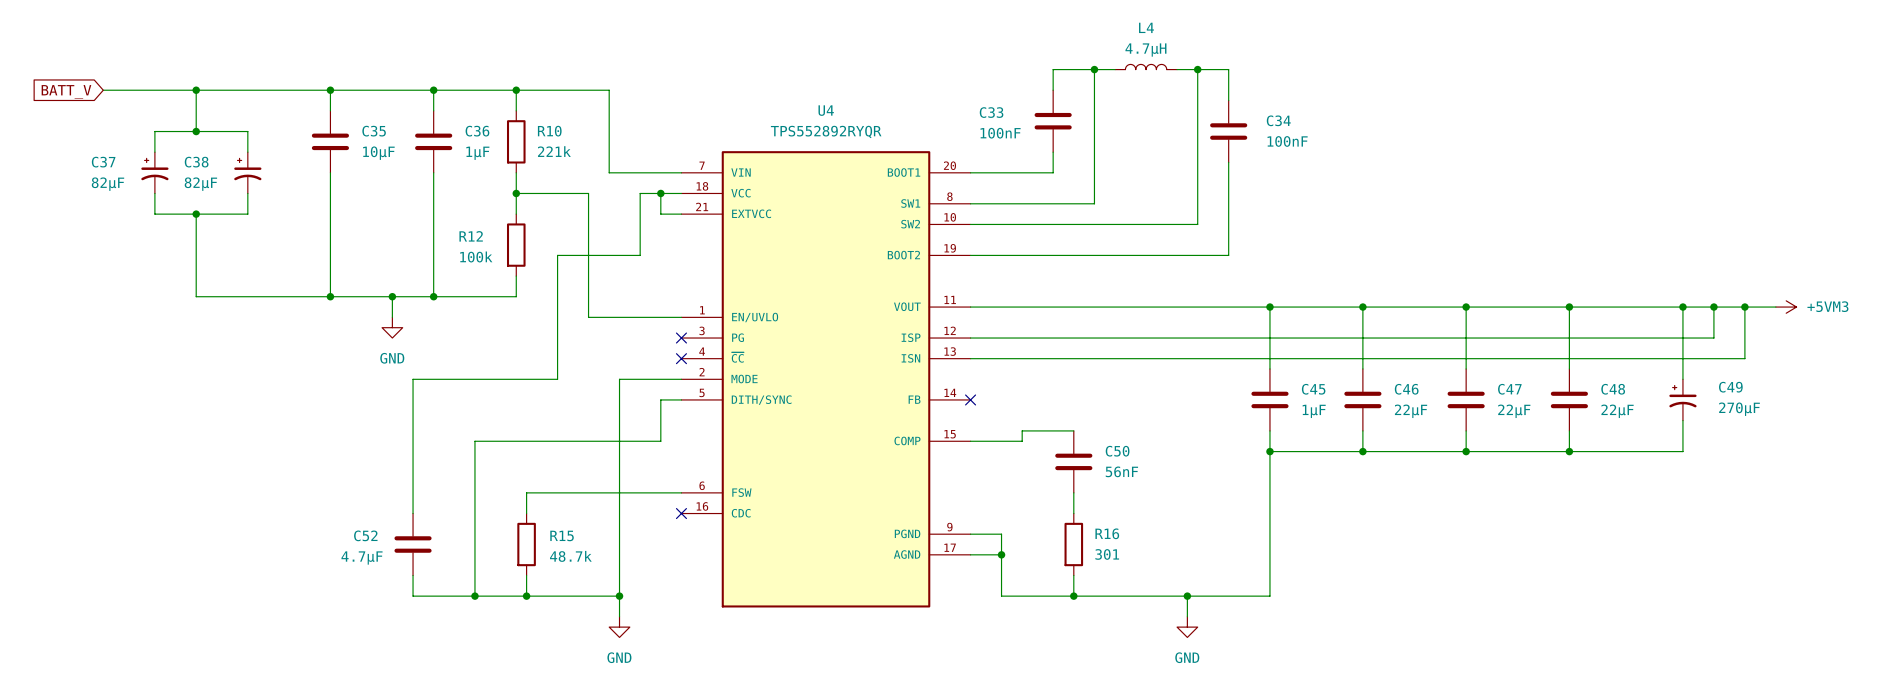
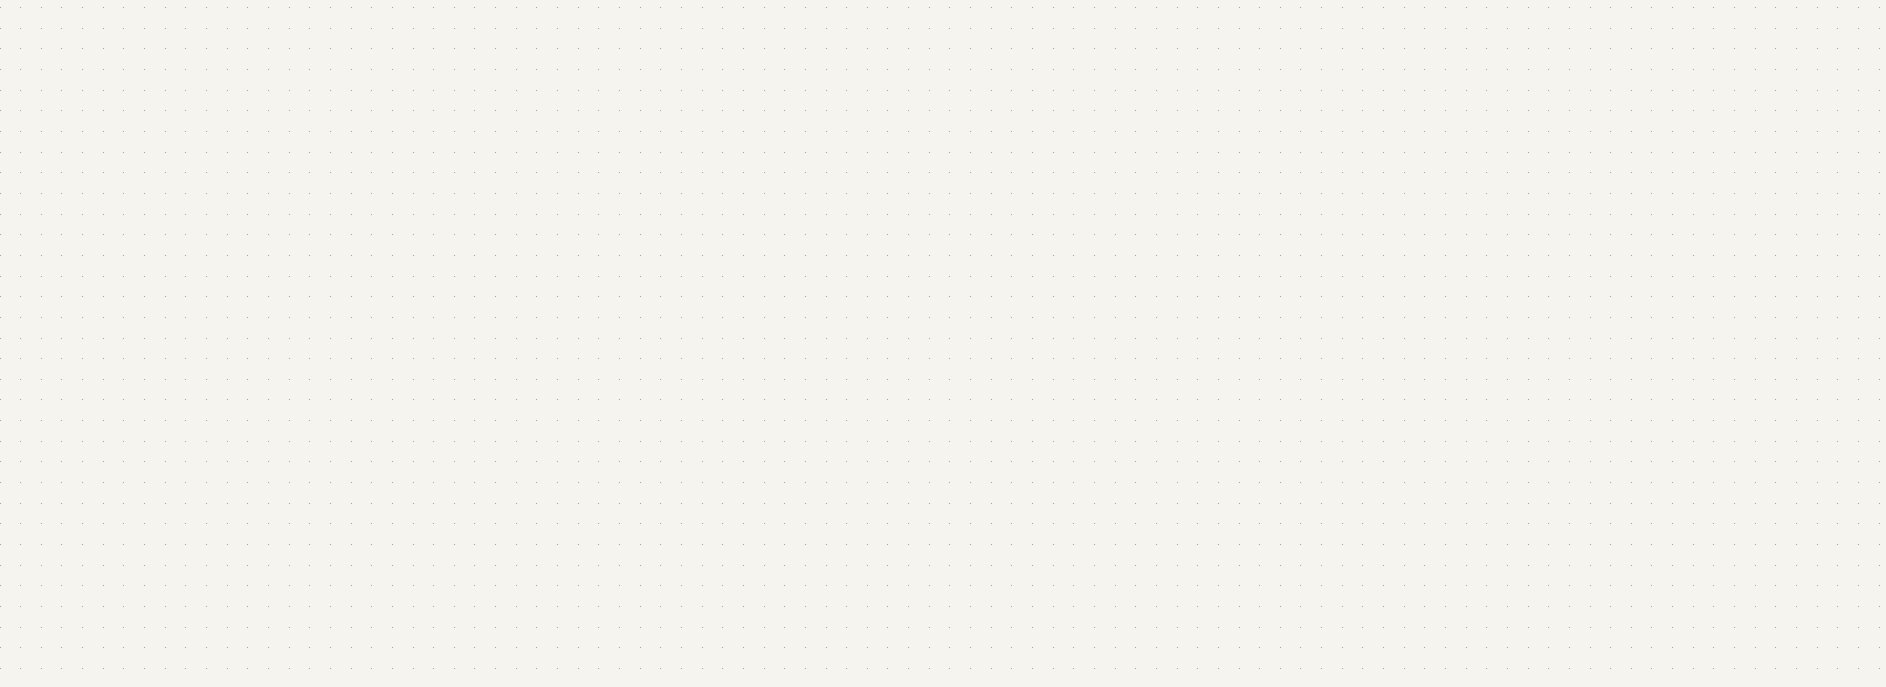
L4: 4.7µH (1146, 67) -> none
wire: (1094, 69) (1094, 203) (970, 203) -> none
junction: (1094, 69) -> none
wire: (1115, 69) (1053, 69) (1053, 90) -> none
wire: (1177, 69) (1228, 69) (1228, 100) -> none
wire: (1197, 69) (1197, 224) (970, 224) -> none
junction: (1197, 69) -> none
wire: (103, 90) (609, 90) (609, 172) (681, 172) -> none
wire: (196, 90) (196, 131) -> none
junction: (196, 90) -> none
wire: (330, 90) (330, 110) -> none
junction: (330, 90) -> none
wire: (433, 90) (433, 110) -> none
junction: (433, 90) -> none
wire: (516, 90) (516, 110) -> none
junction: (516, 90) -> none
global label: BATT_V (66, 91) -> none
C33: 100nF (1053, 121) -> none
junction: (196, 131) -> none
C34: 100nF (1228, 131) -> none
C35: 10µF (330, 141) -> none
C36: 1µF (433, 141) -> none
R10: 221k (516, 141) -> none
wire: (154, 152) (154, 131) (247, 131) (247, 152) -> none
wire: (1053, 152) (1053, 172) (970, 172) -> none
wire: (1228, 162) (1228, 255) (970, 255) -> none
C37: 82µF (154, 172) -> none
C38: 82µF (247, 172) -> none
wire: (330, 172) (330, 296) -> none
wire: (433, 172) (433, 296) -> none
wire: (516, 172) (516, 214) -> none
wire: (154, 193) (154, 214) (247, 214) (247, 193) -> none
wire: (516, 193) (588, 193) (588, 317) (681, 317) -> none
junction: (516, 193) -> none
wire: (660, 193) (660, 214) (681, 214) -> none
junction: (660, 193) -> none
wire: (681, 193) (640, 193) (640, 255) (557, 255) (557, 379) (413, 379) (413, 513) -> none
wire: (196, 214) (196, 296) (516, 296) (516, 276) -> none
junction: (196, 214) -> none
R12: 100k (516, 245) -> none
junction: (330, 296) -> none
wire: (392, 296) (392, 317) -> none
junction: (392, 296) -> none
junction: (433, 296) -> none
wire: (970, 307) (1775, 307) -> none
wire: (1269, 307) (1269, 368) -> none
junction: (1269, 307) -> none
wire: (1362, 307) (1362, 368) -> none
junction: (1362, 307) -> none
wire: (1466, 307) (1466, 368) -> none
junction: (1466, 307) -> none
wire: (1569, 307) (1569, 368) -> none
junction: (1569, 307) -> none
wire: (1682, 307) (1682, 379) -> none
junction: (1682, 307) -> none
wire: (1713, 307) (1713, 338) (970, 338) -> none
junction: (1713, 307) -> none
wire: (1744, 307) (1744, 358) (970, 358) -> none
junction: (1744, 307) -> none
power symbol: +5VM3 (1786, 307) -> none
power symbol: GND (392, 327) -> none
no-connect mark: (681, 338) -> none
no-connect mark: (681, 358) -> none
wire: (681, 379) (619, 379) (619, 616) -> none
U4: TPS552892RYQR (826, 379) -> none
wire: (681, 399) (660, 399) (660, 441) (474, 441) (474, 596) -> none
no-connect mark: (970, 399) -> none
C45: 1µF (1269, 399) -> none
C46: 22µF (1362, 399) -> none
C47: 22µF (1466, 399) -> none
C48: 22µF (1569, 399) -> none
C49: 270µF (1682, 399) -> none
wire: (1682, 420) (1682, 451) (1269, 451) -> none
wire: (1073, 430) (1022, 430) (1022, 441) (970, 441) -> none
wire: (1269, 430) (1269, 596) (1001, 596) (1001, 534) (970, 534) -> none
wire: (1362, 430) (1362, 451) -> none
wire: (1466, 430) (1466, 451) -> none
wire: (1569, 430) (1569, 451) -> none
junction: (1269, 451) -> none
junction: (1362, 451) -> none
junction: (1466, 451) -> none
junction: (1569, 451) -> none
C50: 56nF (1073, 461) -> none
wire: (681, 492) (526, 492) (526, 513) -> none
wire: (1073, 492) (1073, 513) -> none
no-connect mark: (681, 513) -> none
C52: 4.7µF (413, 544) -> none
R15: 48.7k (526, 544) -> none
R16: 301 (1073, 544) -> none
wire: (970, 554) (1001, 554) -> none
junction: (1001, 554) -> none
wire: (413, 575) (413, 596) (619, 596) -> none
wire: (526, 575) (526, 596) -> none
wire: (1073, 575) (1073, 596) -> none
junction: (474, 596) -> none
junction: (526, 596) -> none
junction: (619, 596) -> none
junction: (1073, 596) -> none
wire: (1187, 596) (1187, 616) -> none
junction: (1187, 596) -> none
power symbol: GND (619, 627) -> none
power symbol: GND (1187, 627) -> none

